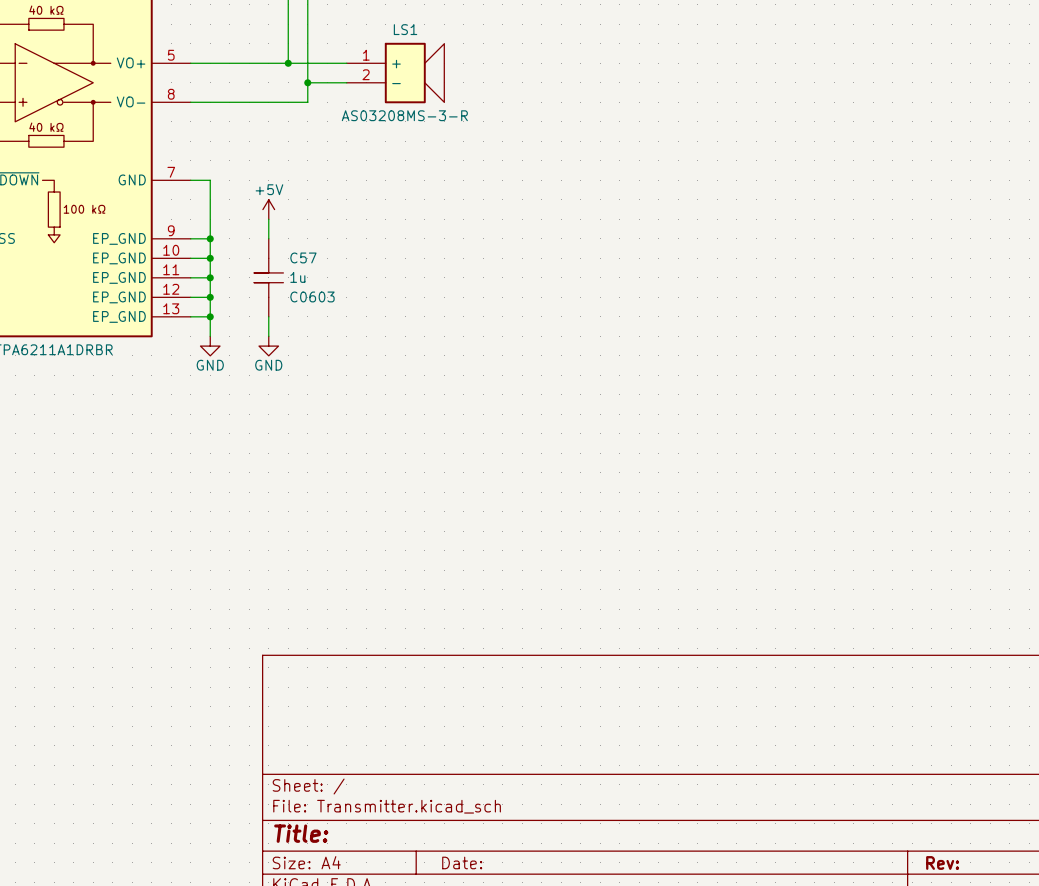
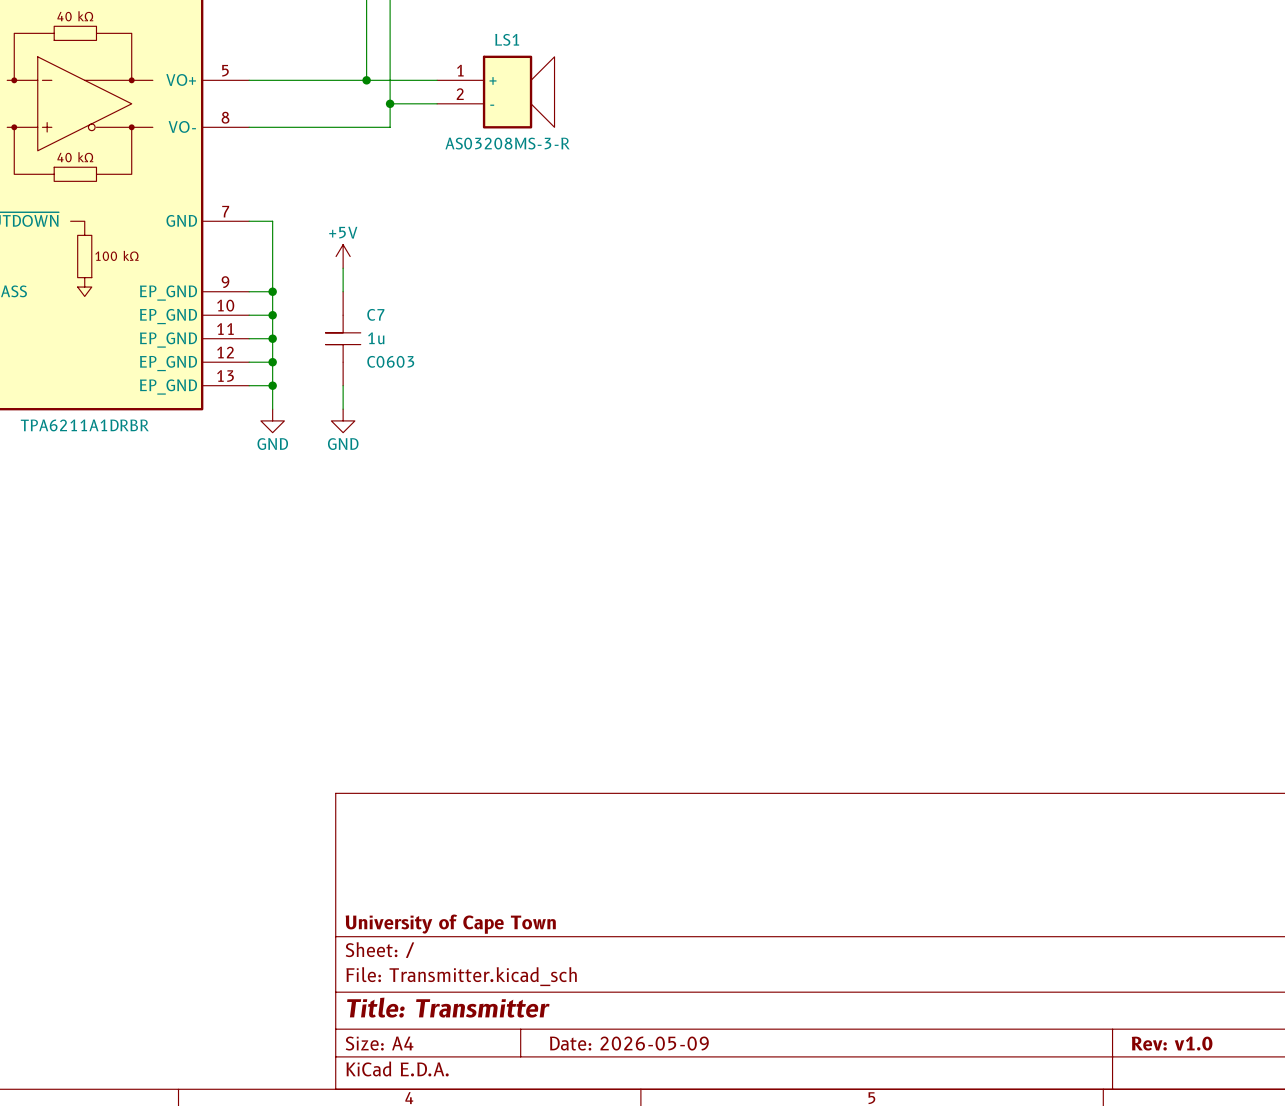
C57 name: C57 (303, 257) -> C7 (375, 314)
title block: none -> University of Cape Town (450, 924)
title block: Title: (301, 833) -> Title: Transmitter (448, 1007)
title block: Date: (462, 862) -> Date: 2026-05-09 (629, 1043)
title block: Rev: (942, 862) -> Rev: v1.0 (1172, 1043)

